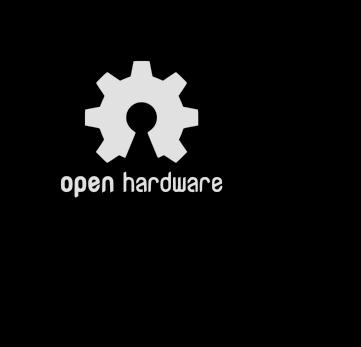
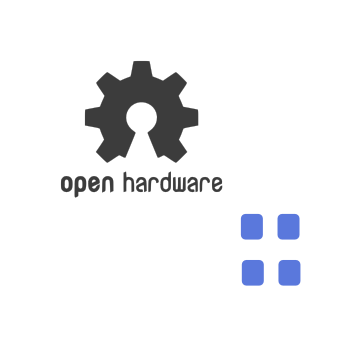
part: none -> (270, 226)
part: none -> (271, 272)

